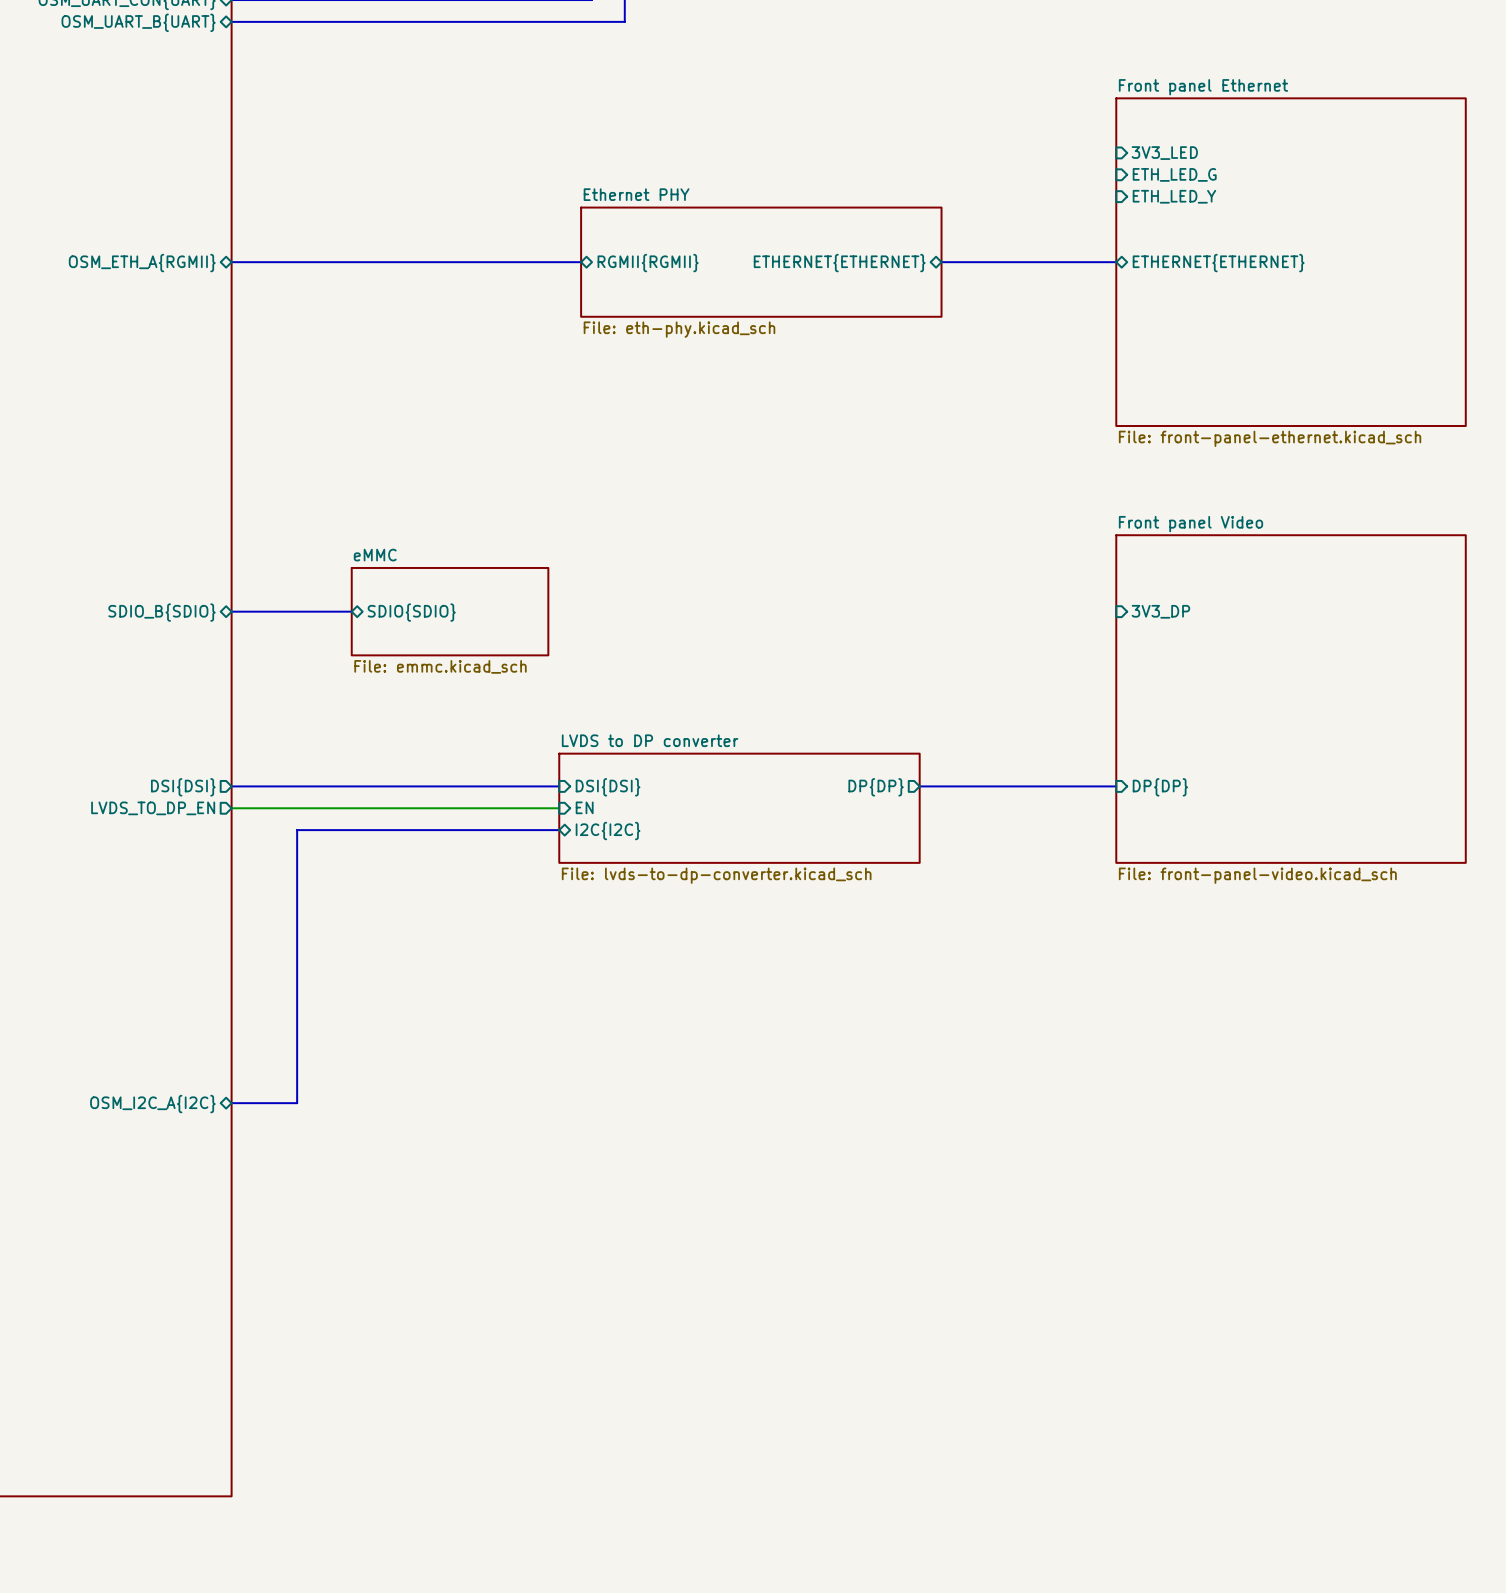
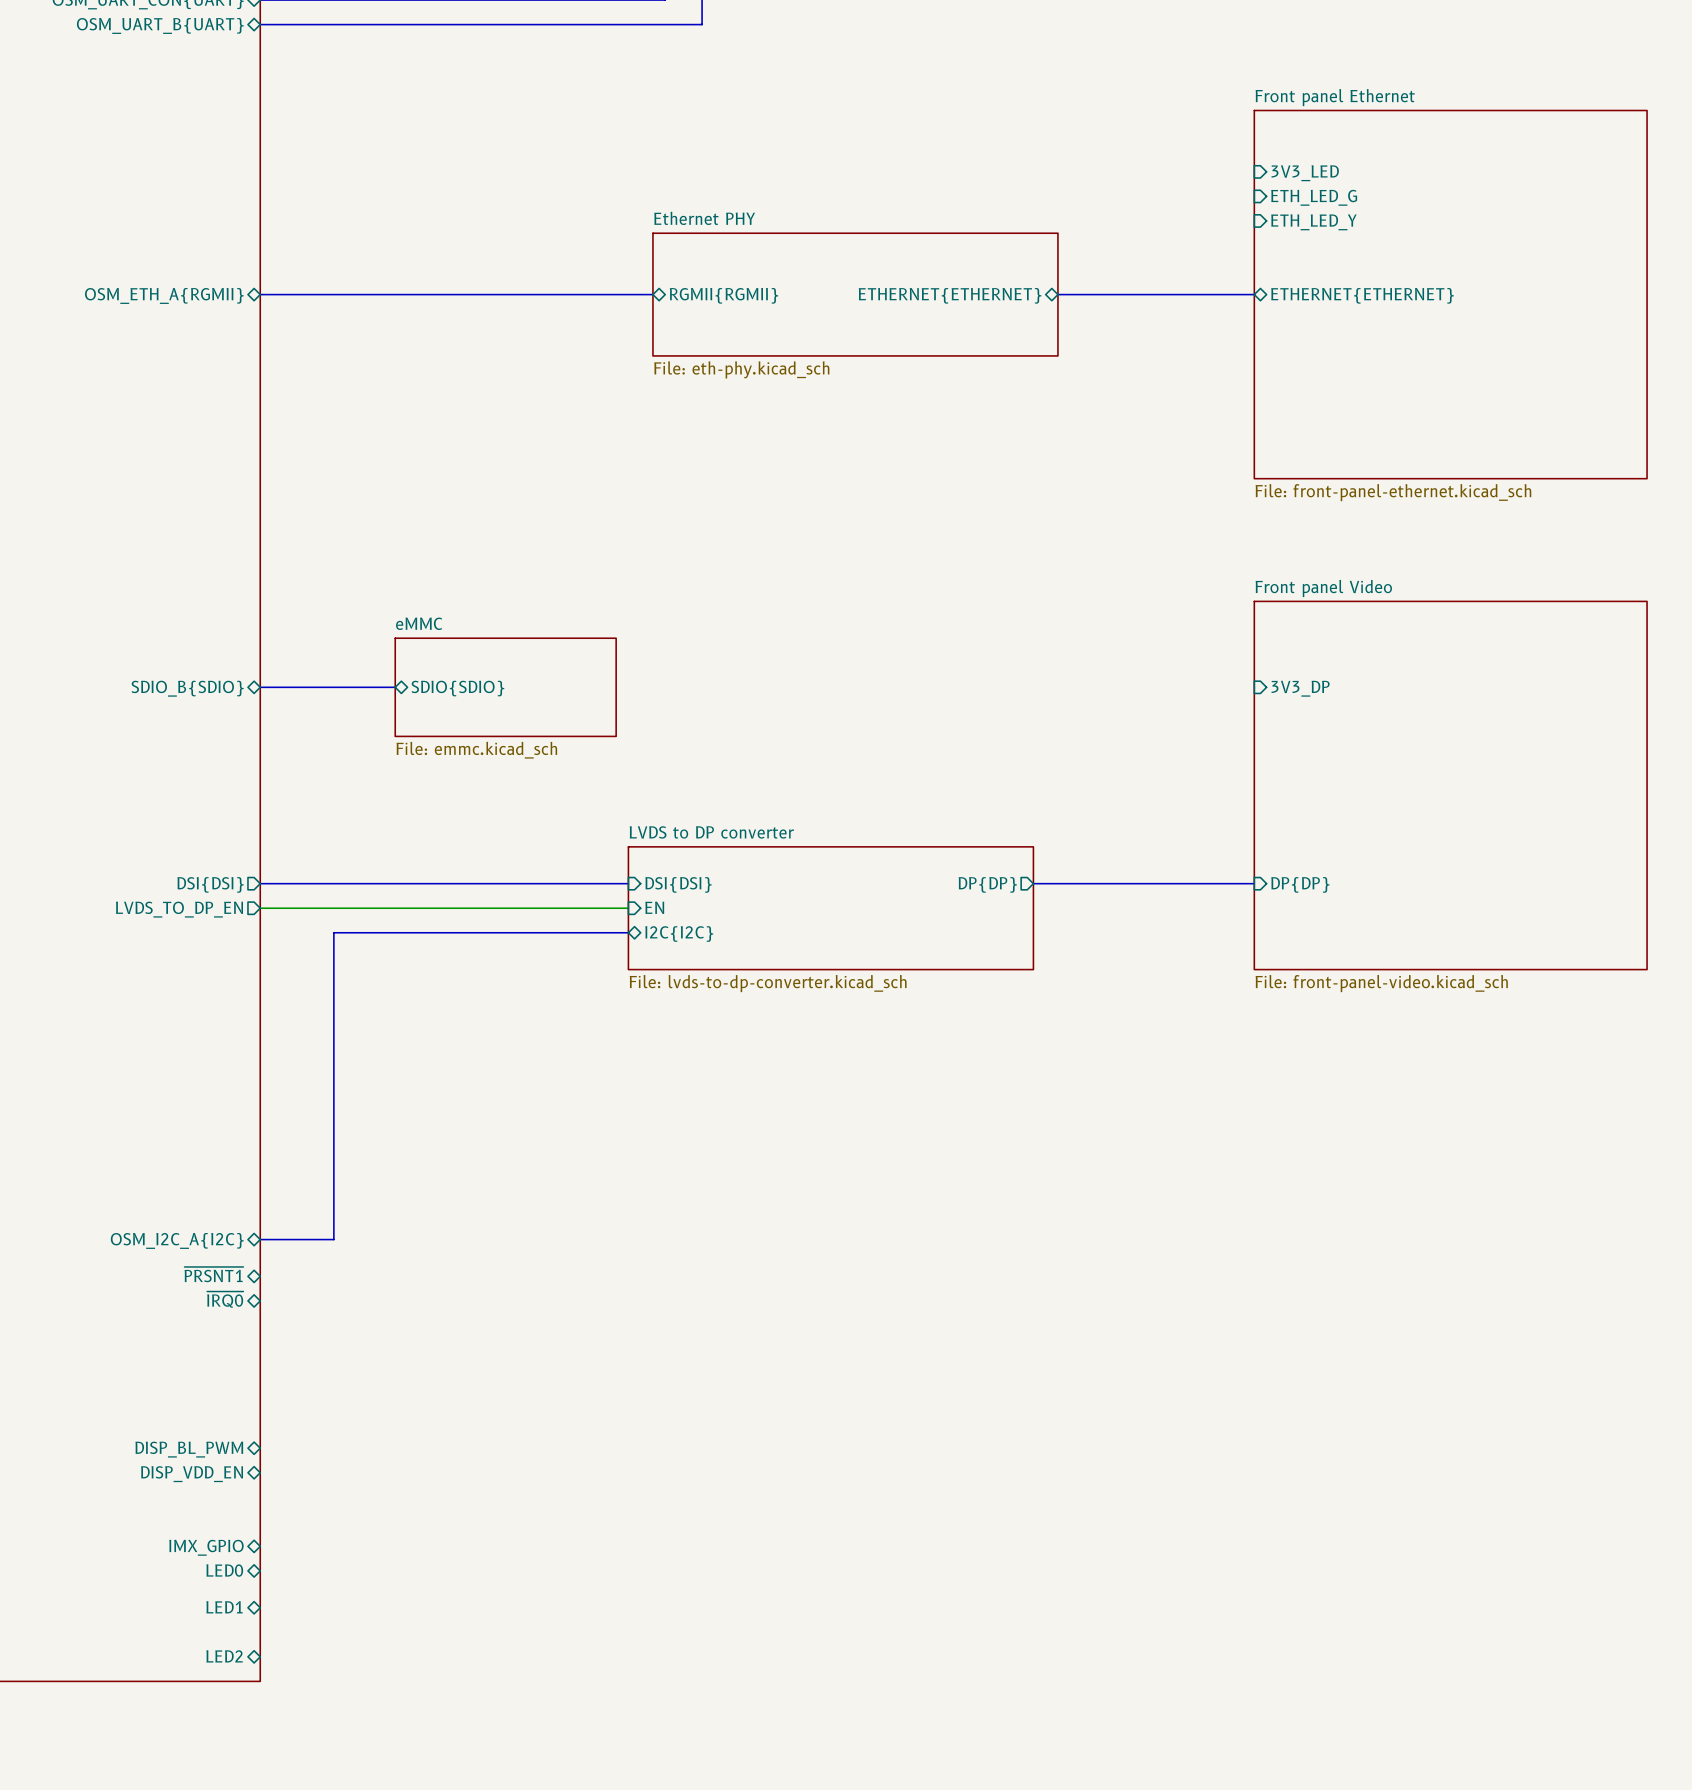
sheet pin: none -> ~{PRSNT1} (213, 1274)
sheet pin: none -> ~{IRQ0} (225, 1299)
sheet pin: none -> DISP_BL_PWM (189, 1449)
sheet pin: none -> DISP_VDD_EN (192, 1474)
sheet pin: none -> IMX_GPIO (206, 1547)
sheet pin: none -> LED0 (224, 1570)
sheet pin: none -> LED1 (224, 1607)
sheet pin: none -> LED2 (224, 1656)

